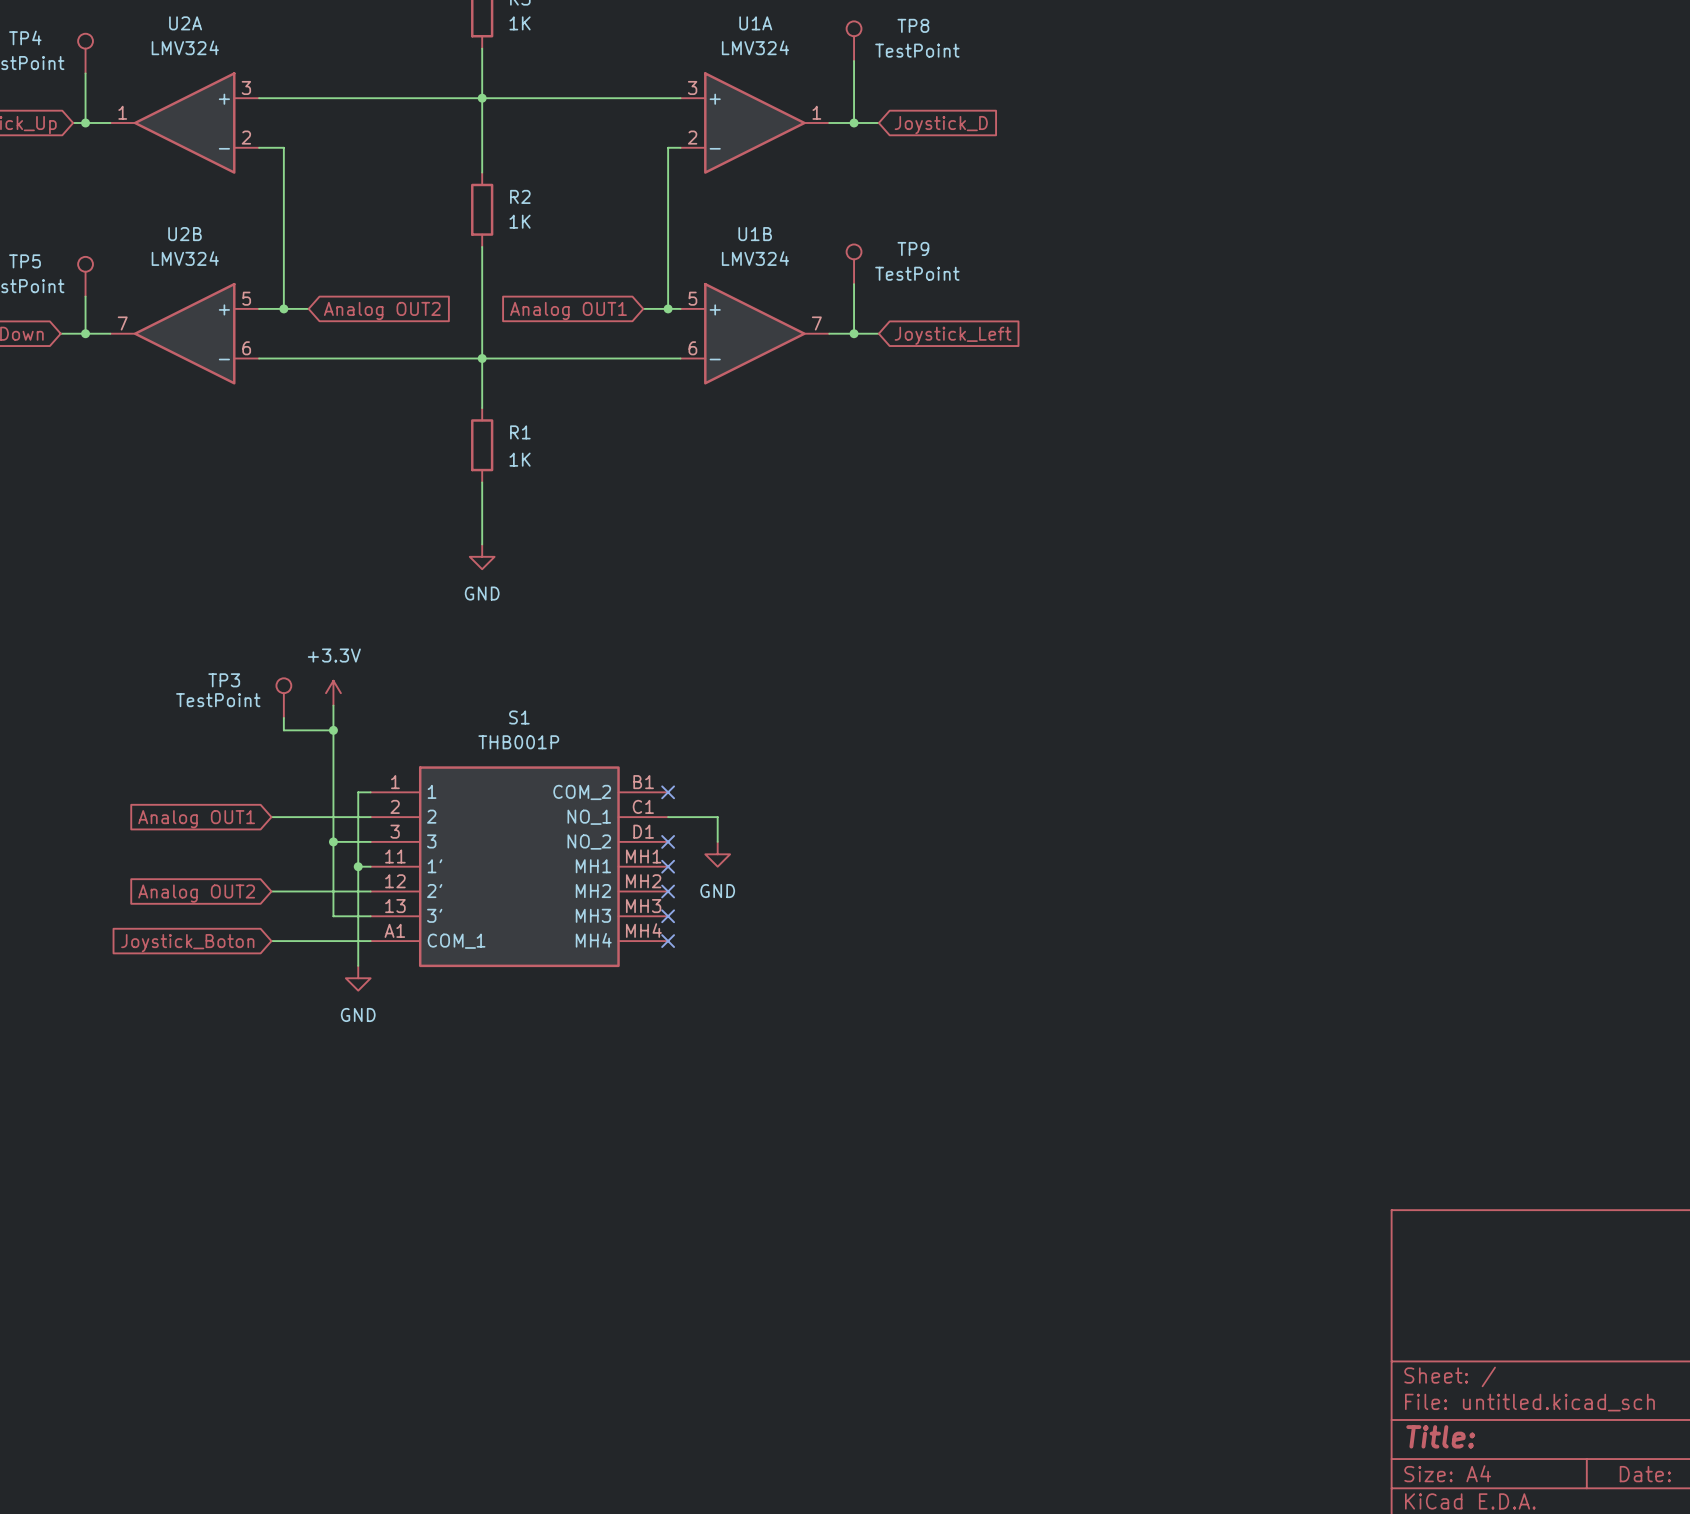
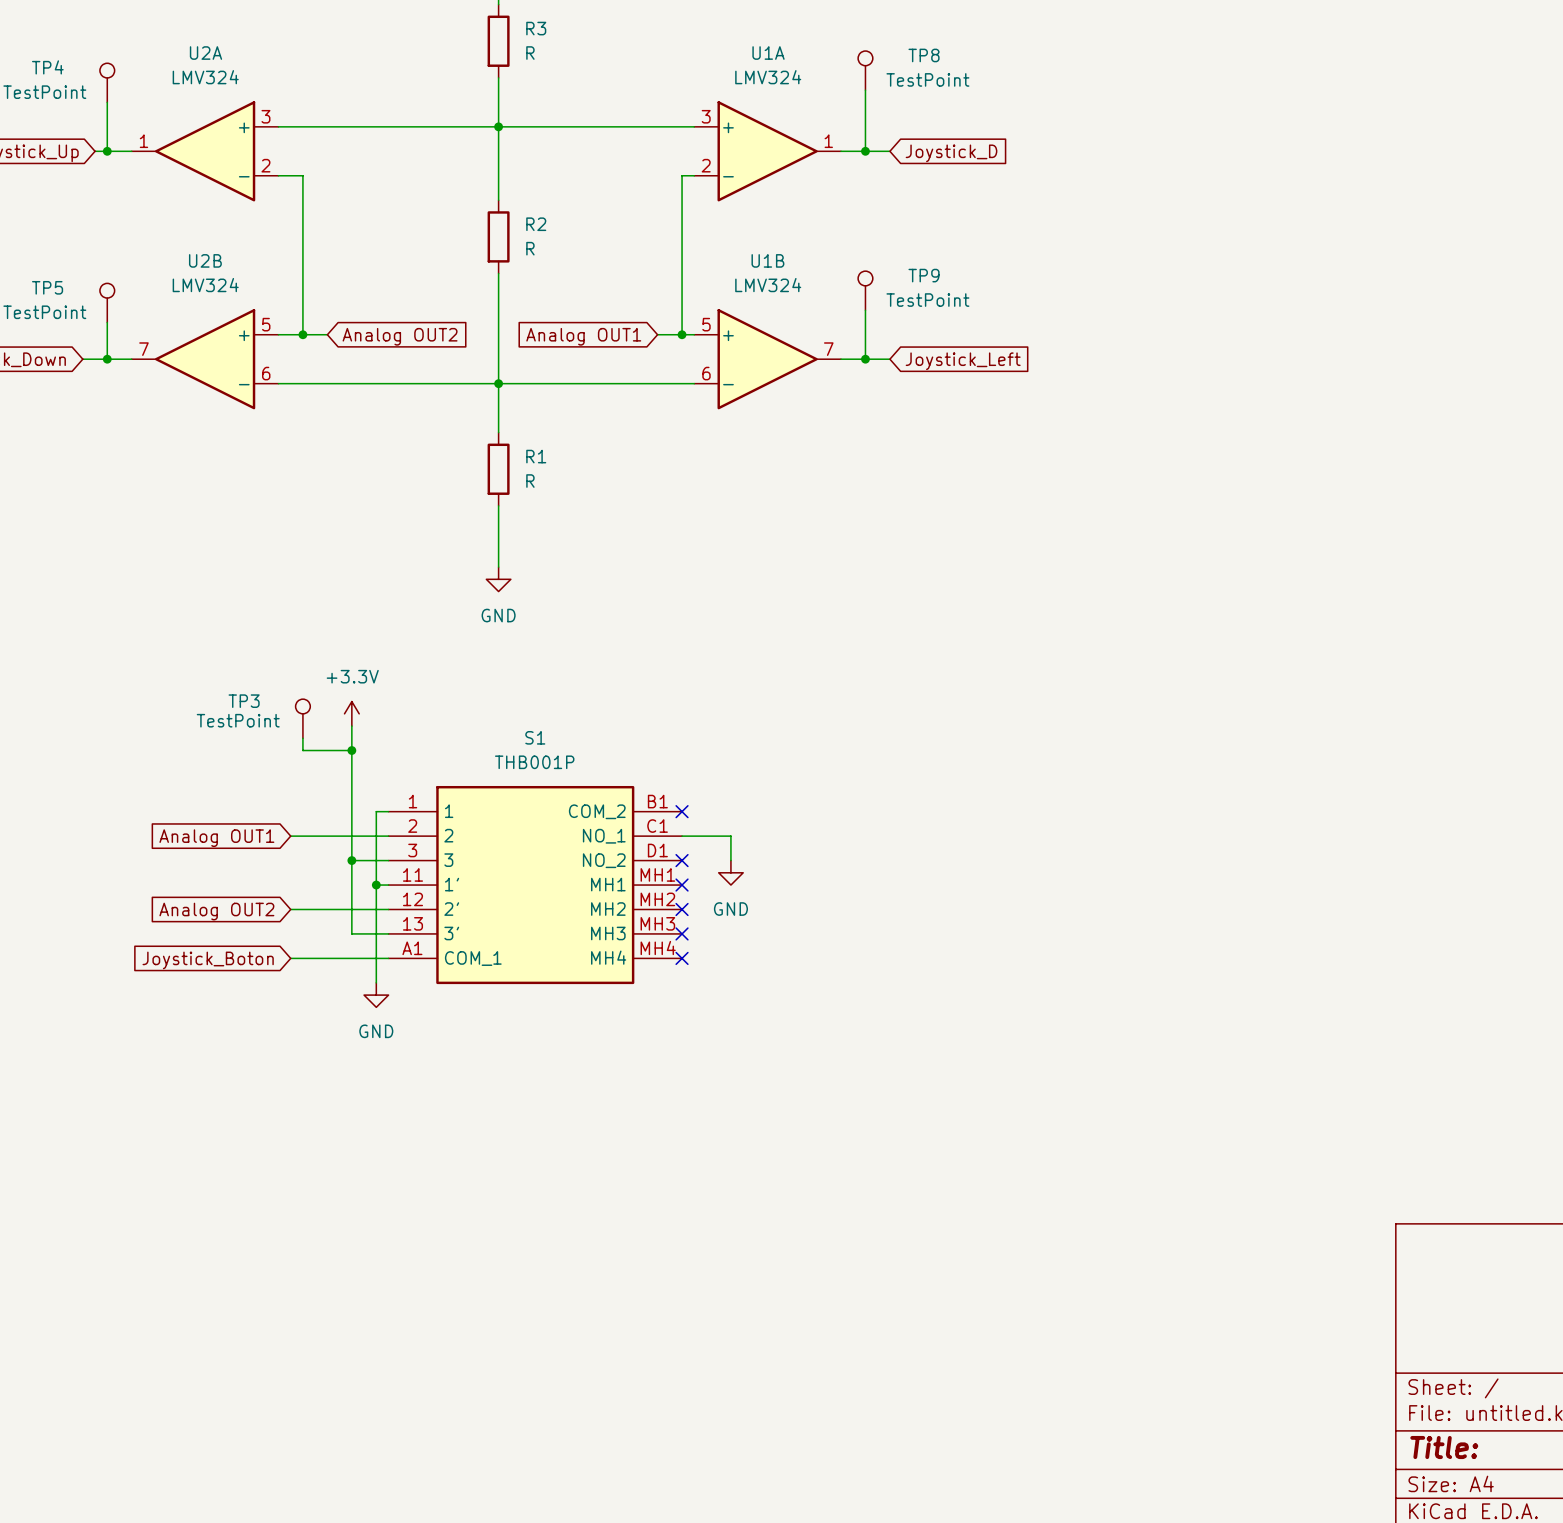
R3 value: 1K (520, 23) -> R (530, 53)
R2 value: 1K (520, 221) -> R (530, 248)
R1 value: 1K (520, 459) -> R (530, 481)

